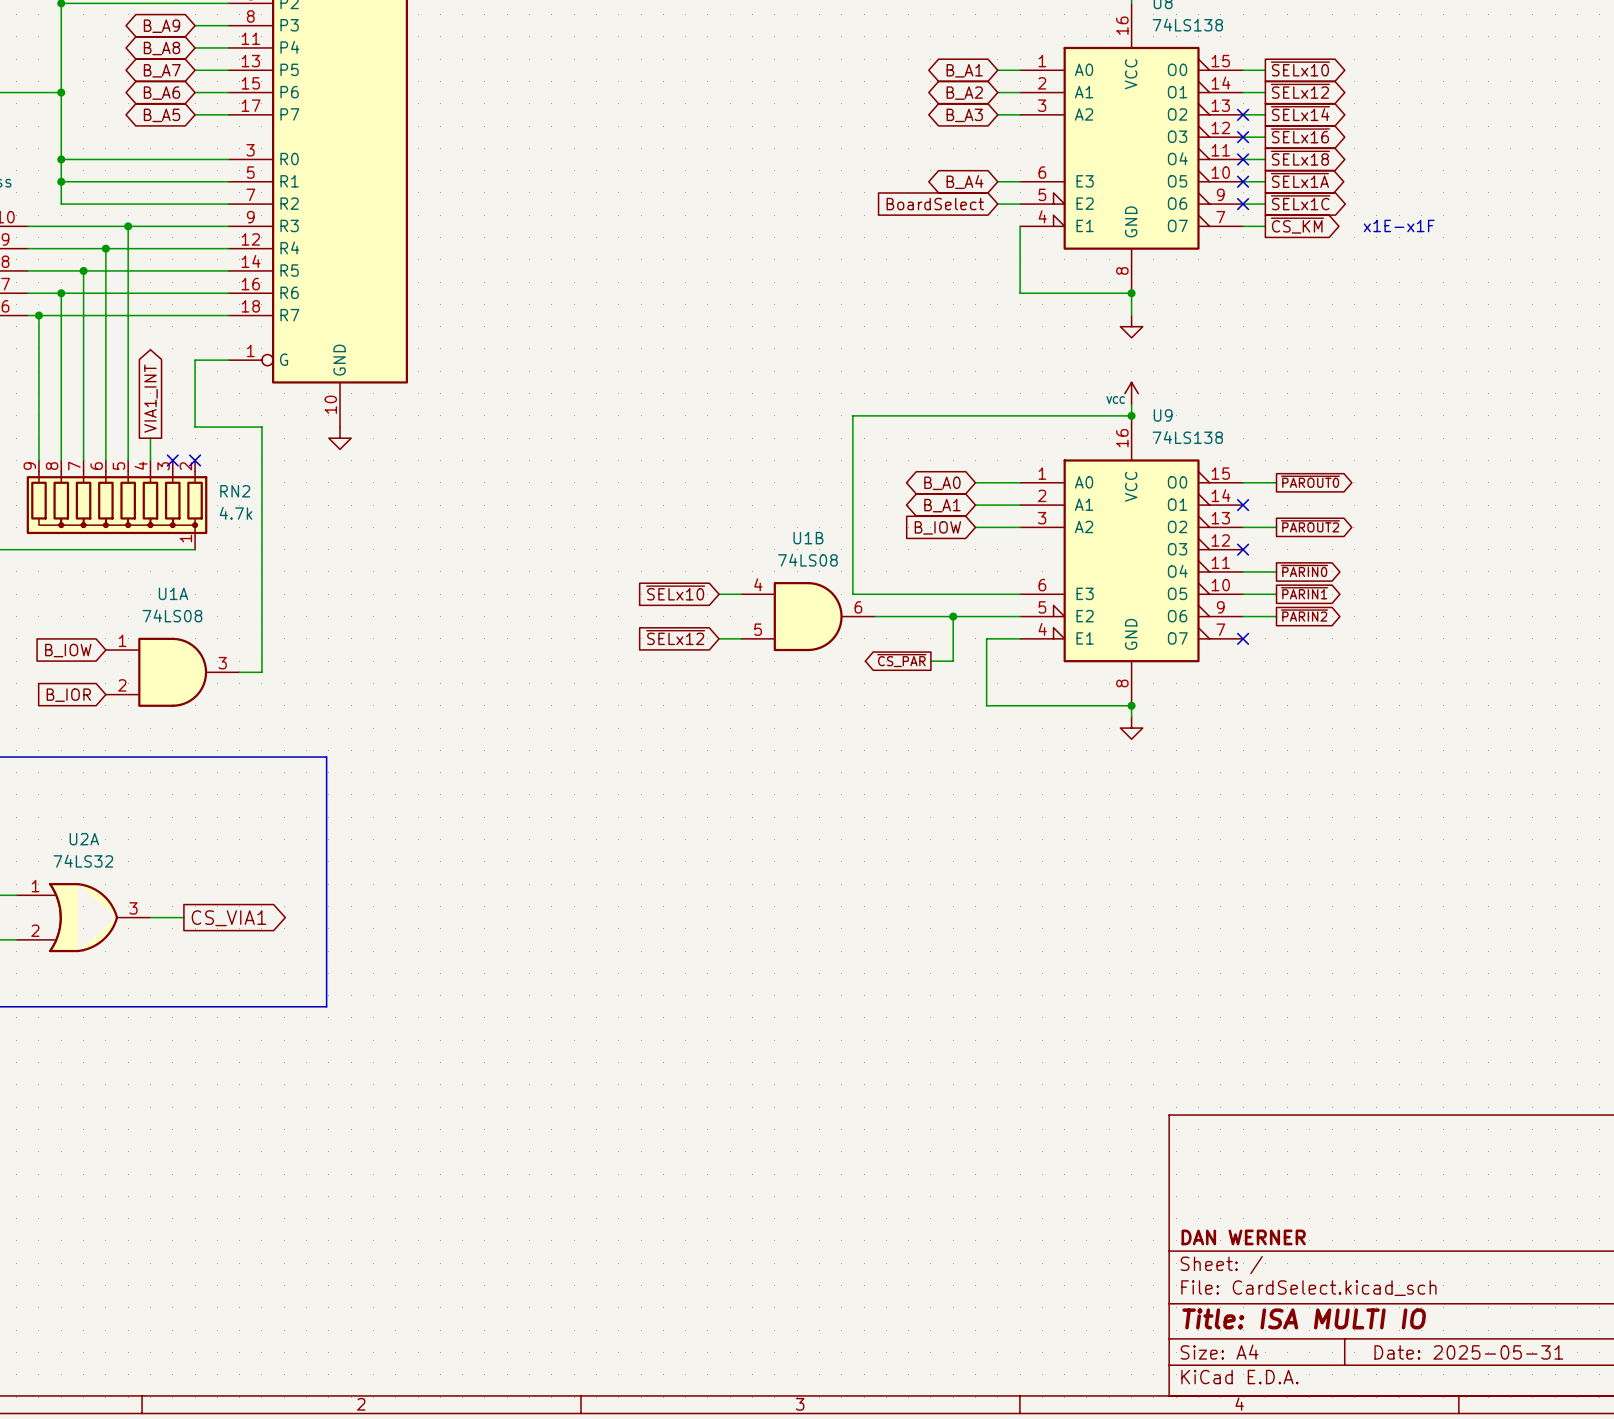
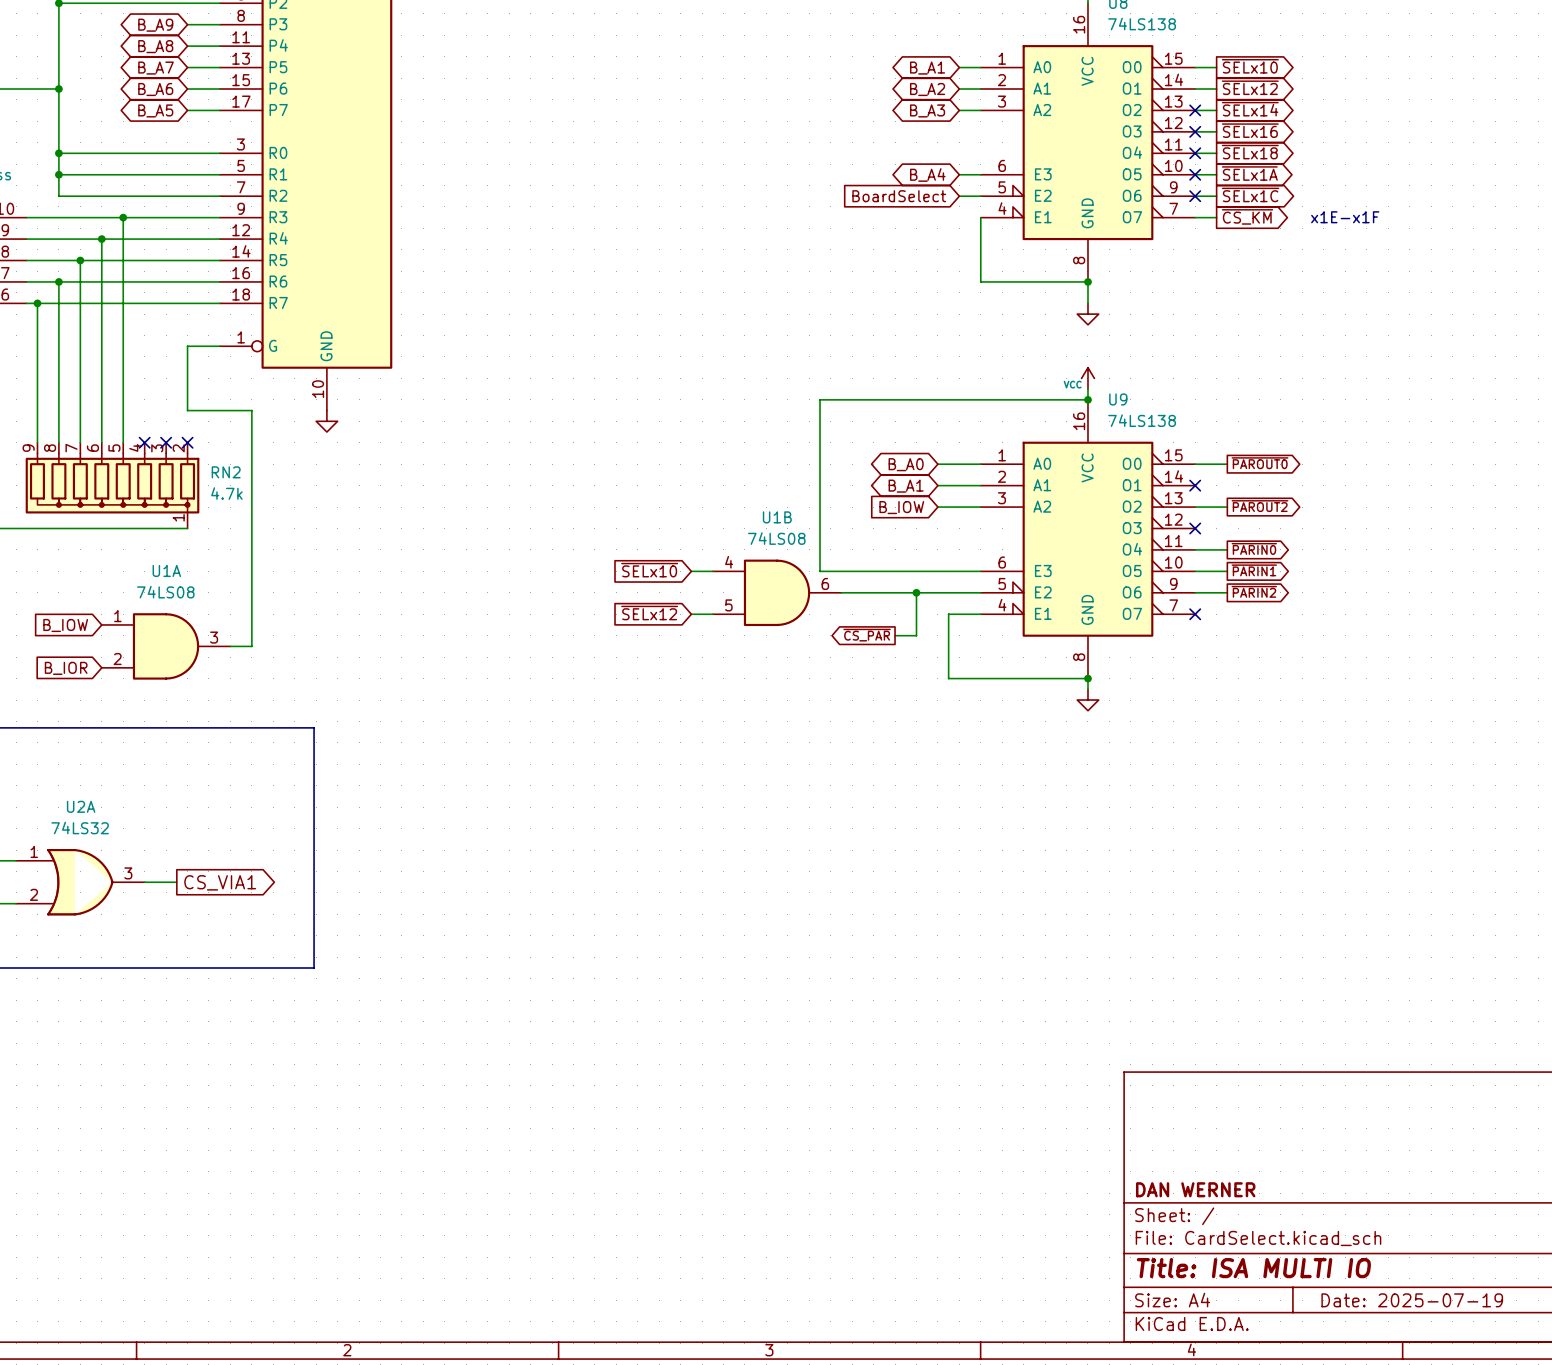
global label: VIA1_INT (151, 398) -> none
wire: (150, 438) (150, 460) -> none
no-connect mark: none -> (144, 442)
title block: Date: 2025-05-31 (1468, 1352) -> Date: 2025-07-19 (1412, 1300)

